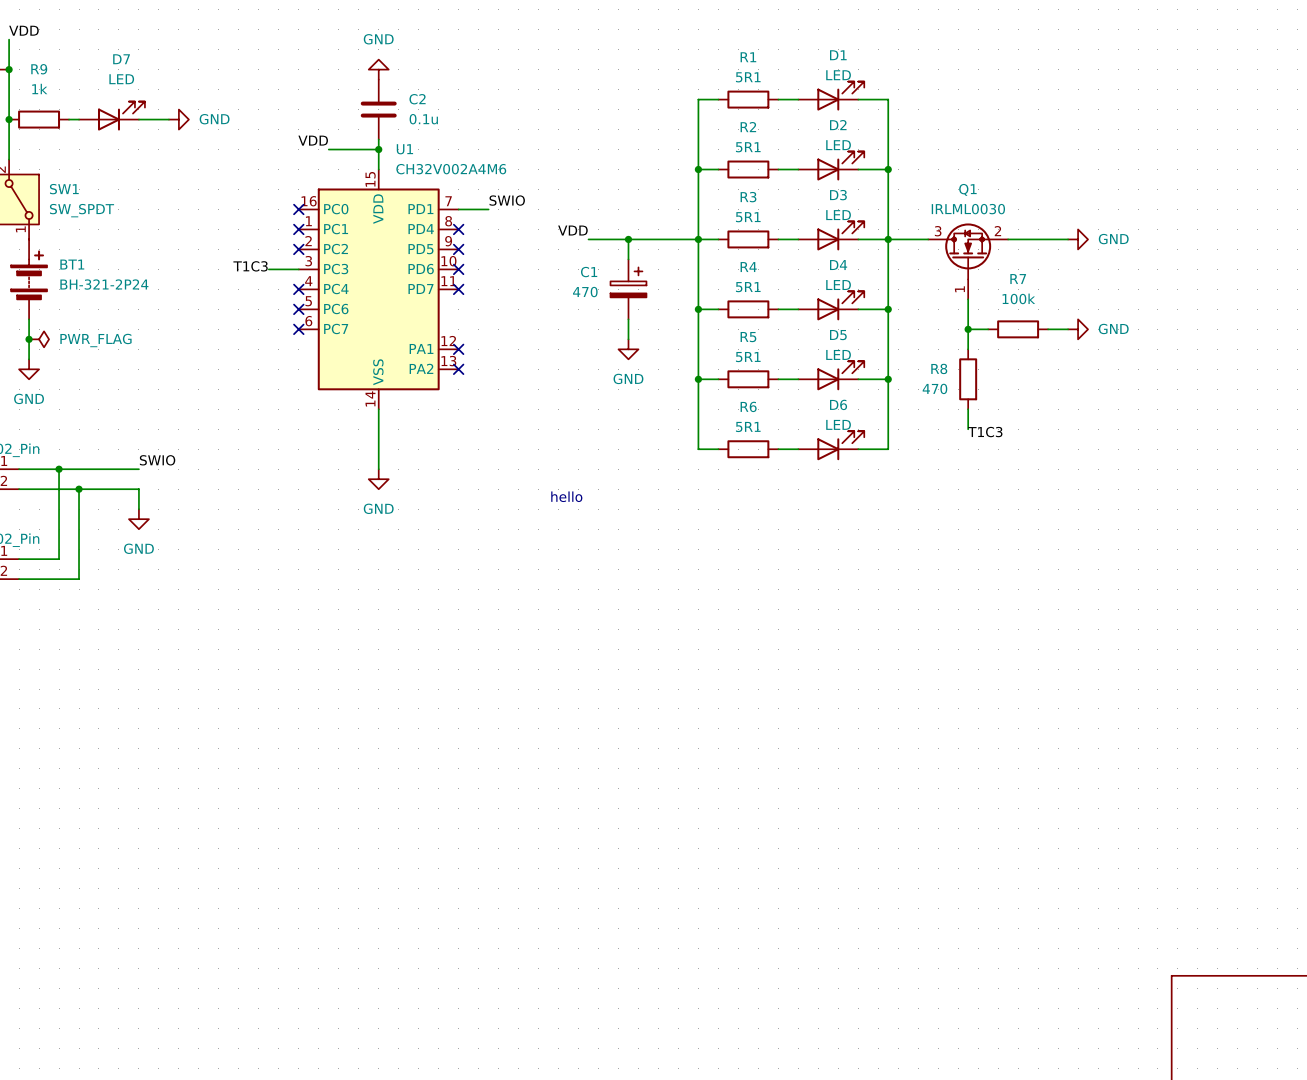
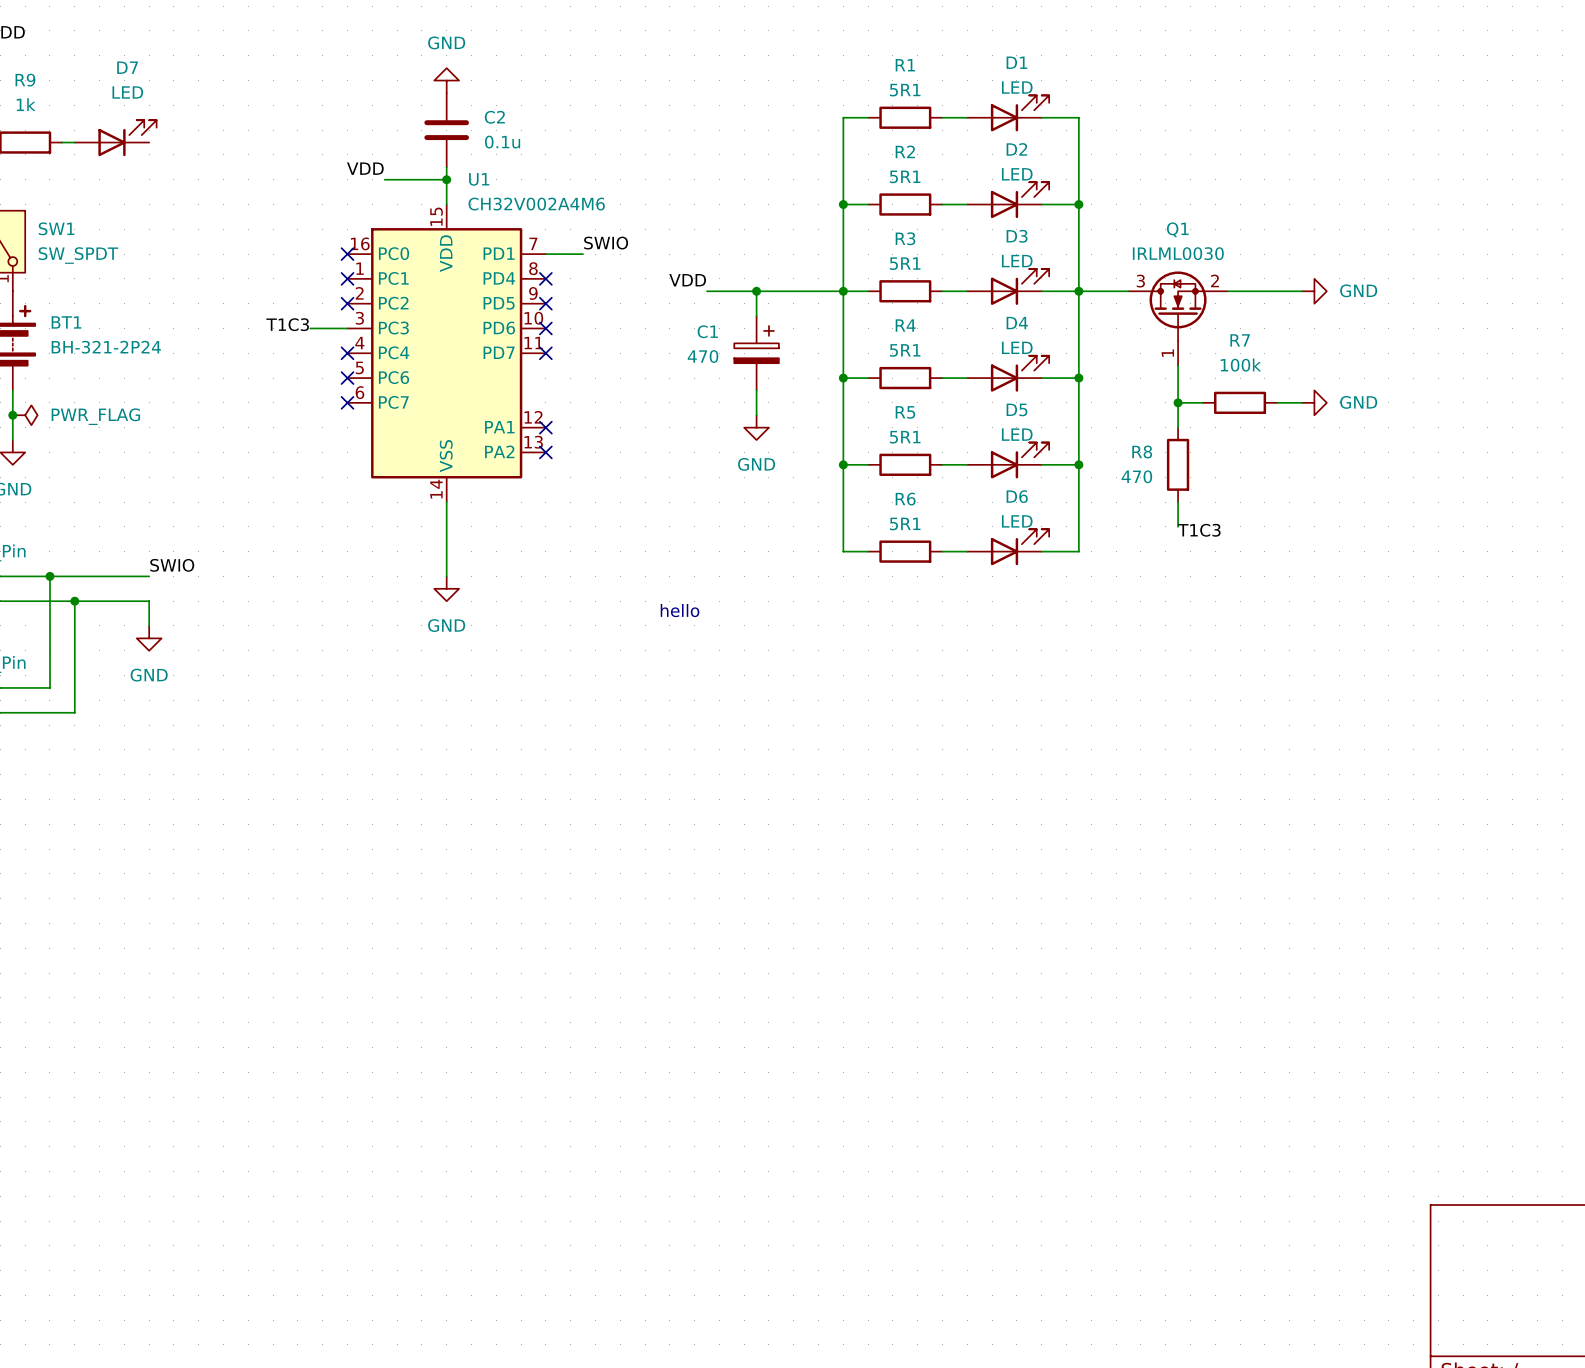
wire: (138, 119) (168, 119) -> none
power symbol: GND (178, 119) -> none

